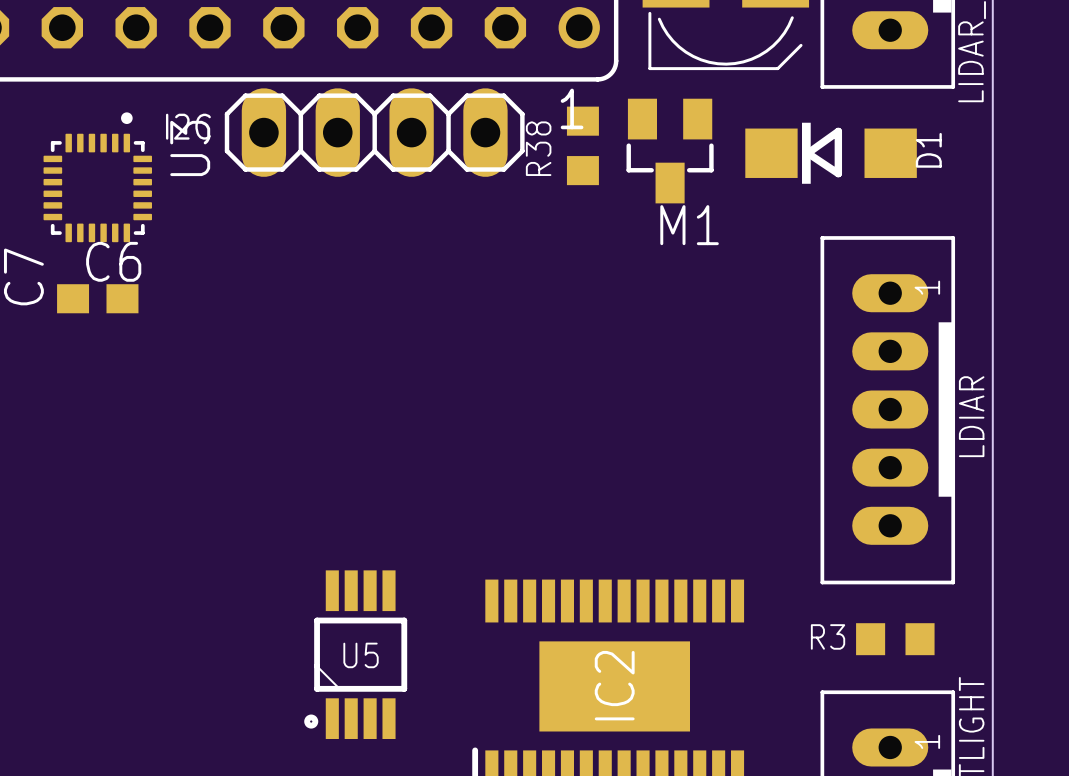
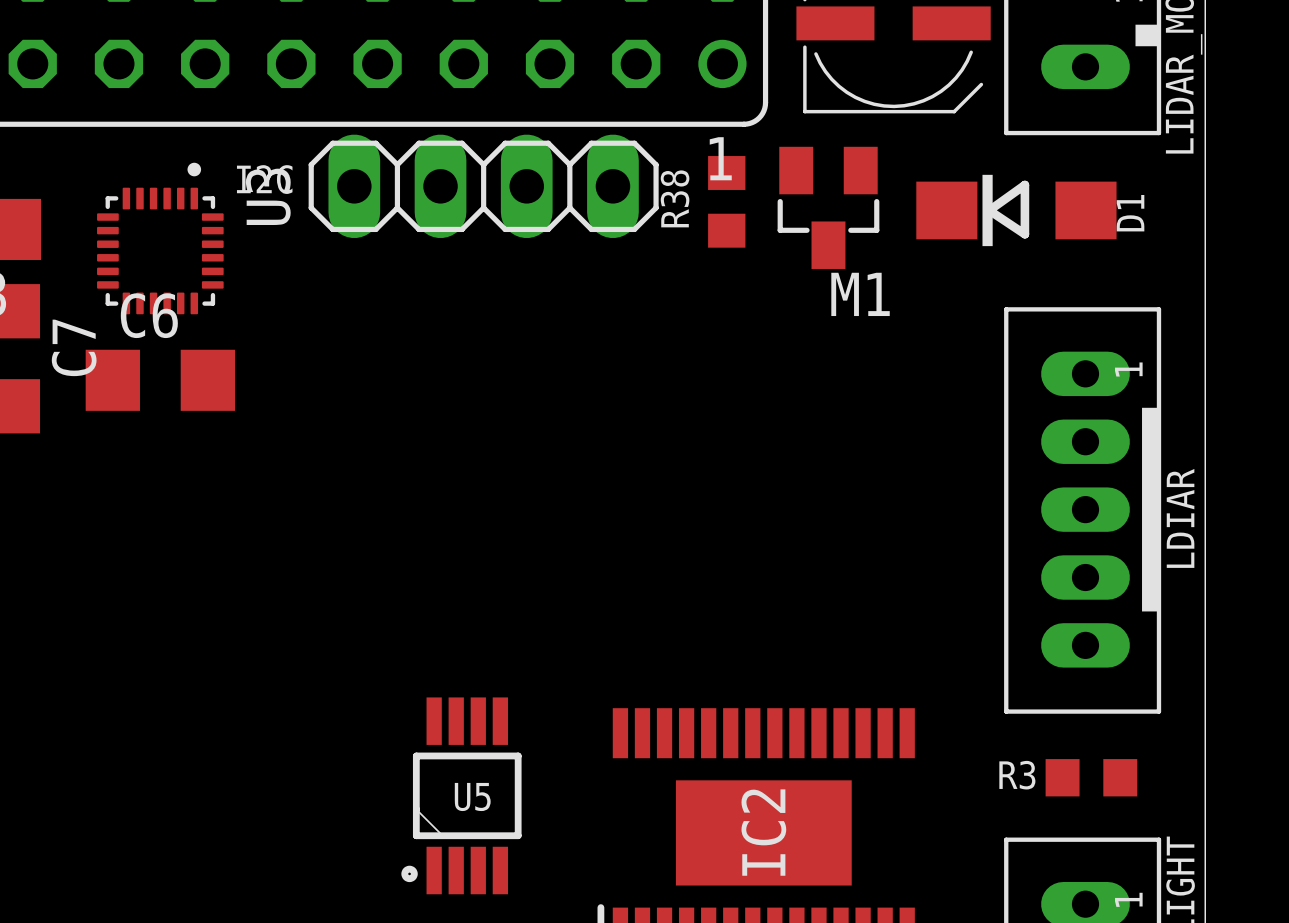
C6 name position: C6 (113, 261) -> C6 (149, 315)
C6 footprint: [57, 284, 139, 314] -> [85, 349, 236, 411]

